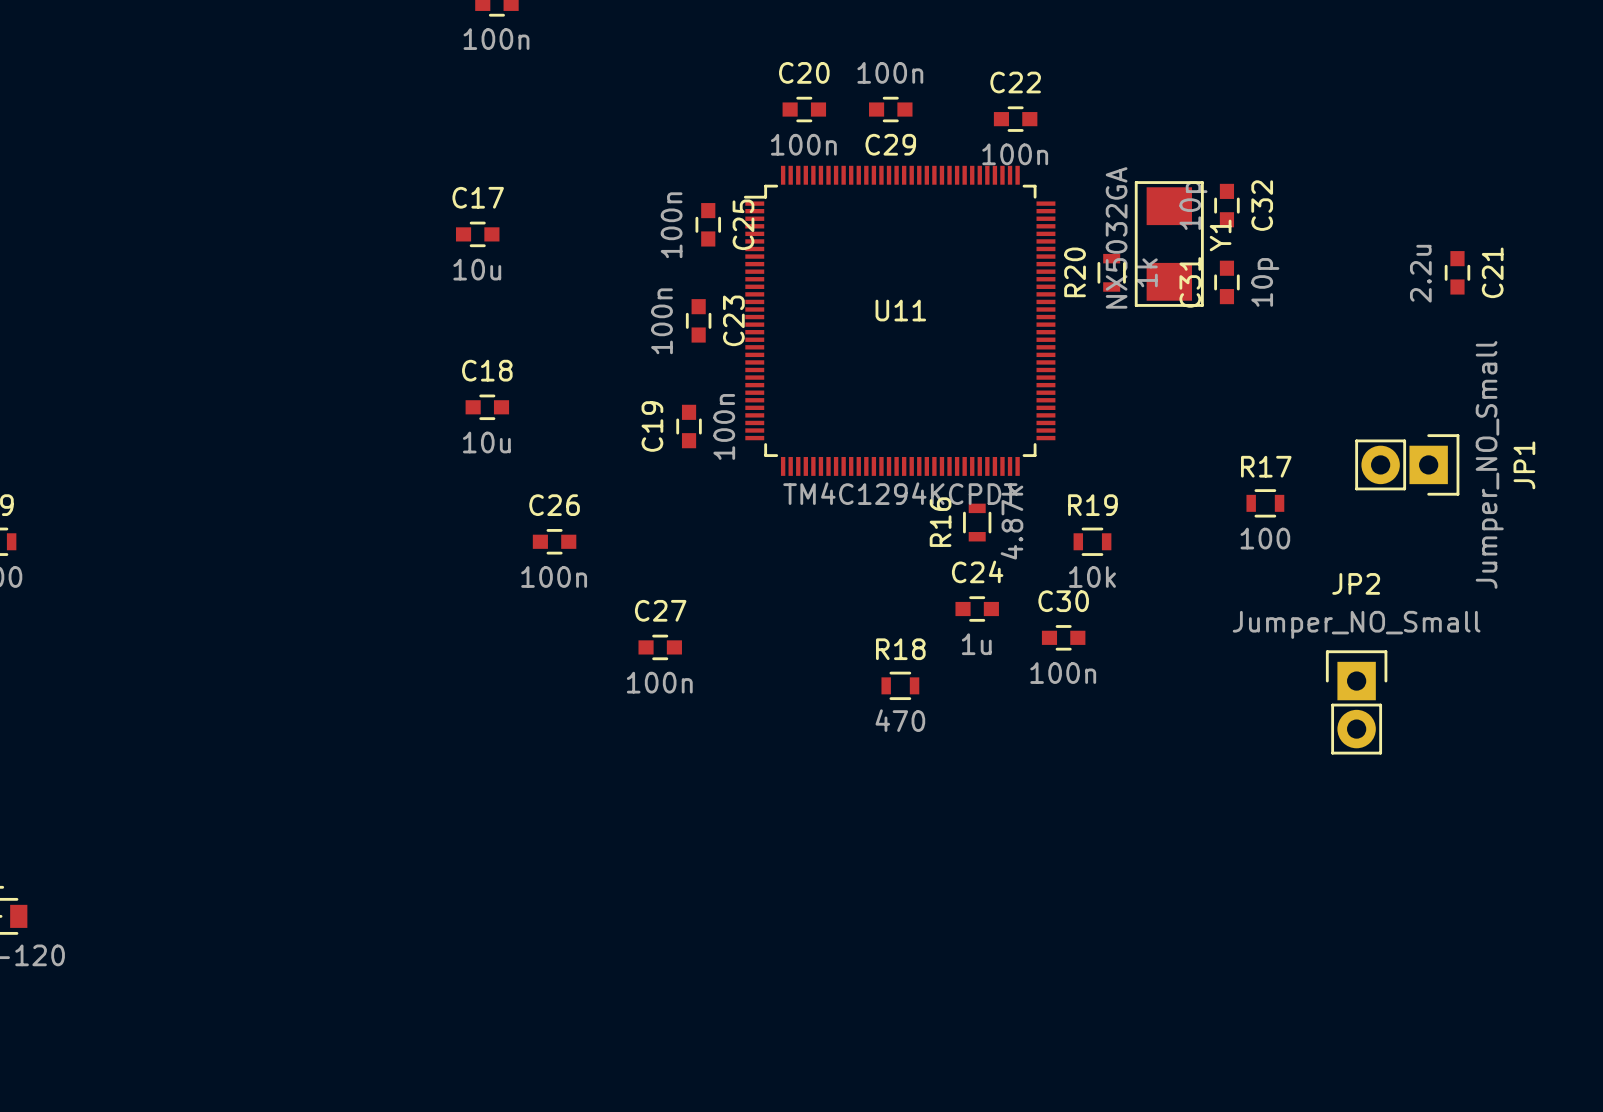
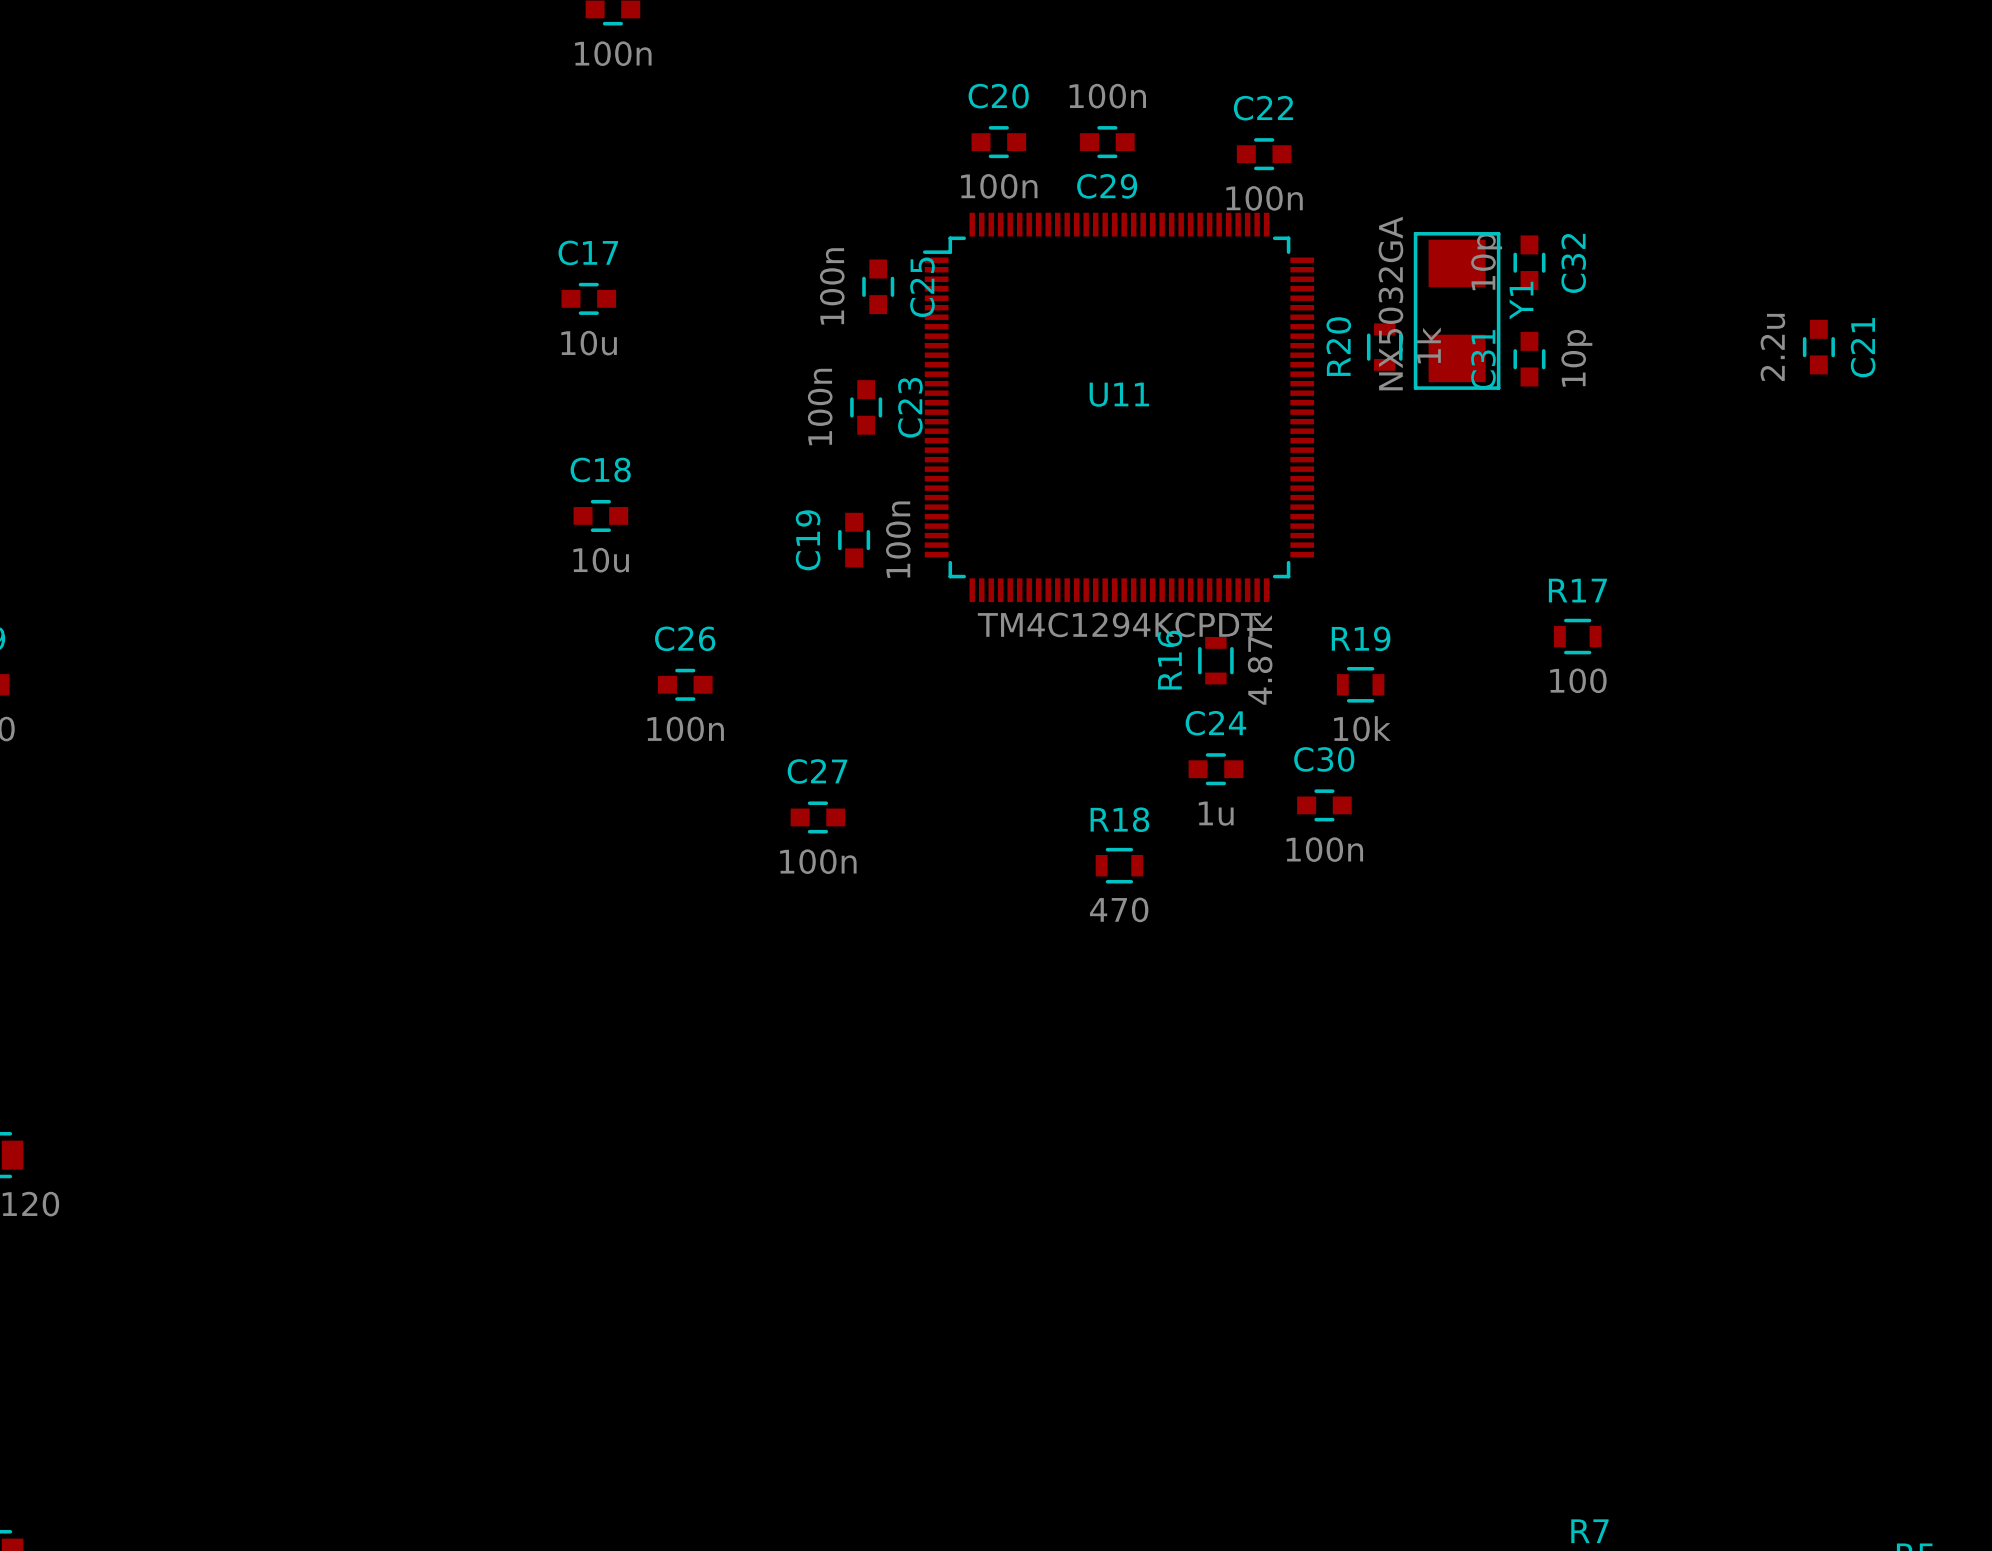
JP1: Jumper_NO_Small (1407, 464) -> none
JP2: Jumper_NO_Small (1356, 702) -> none

